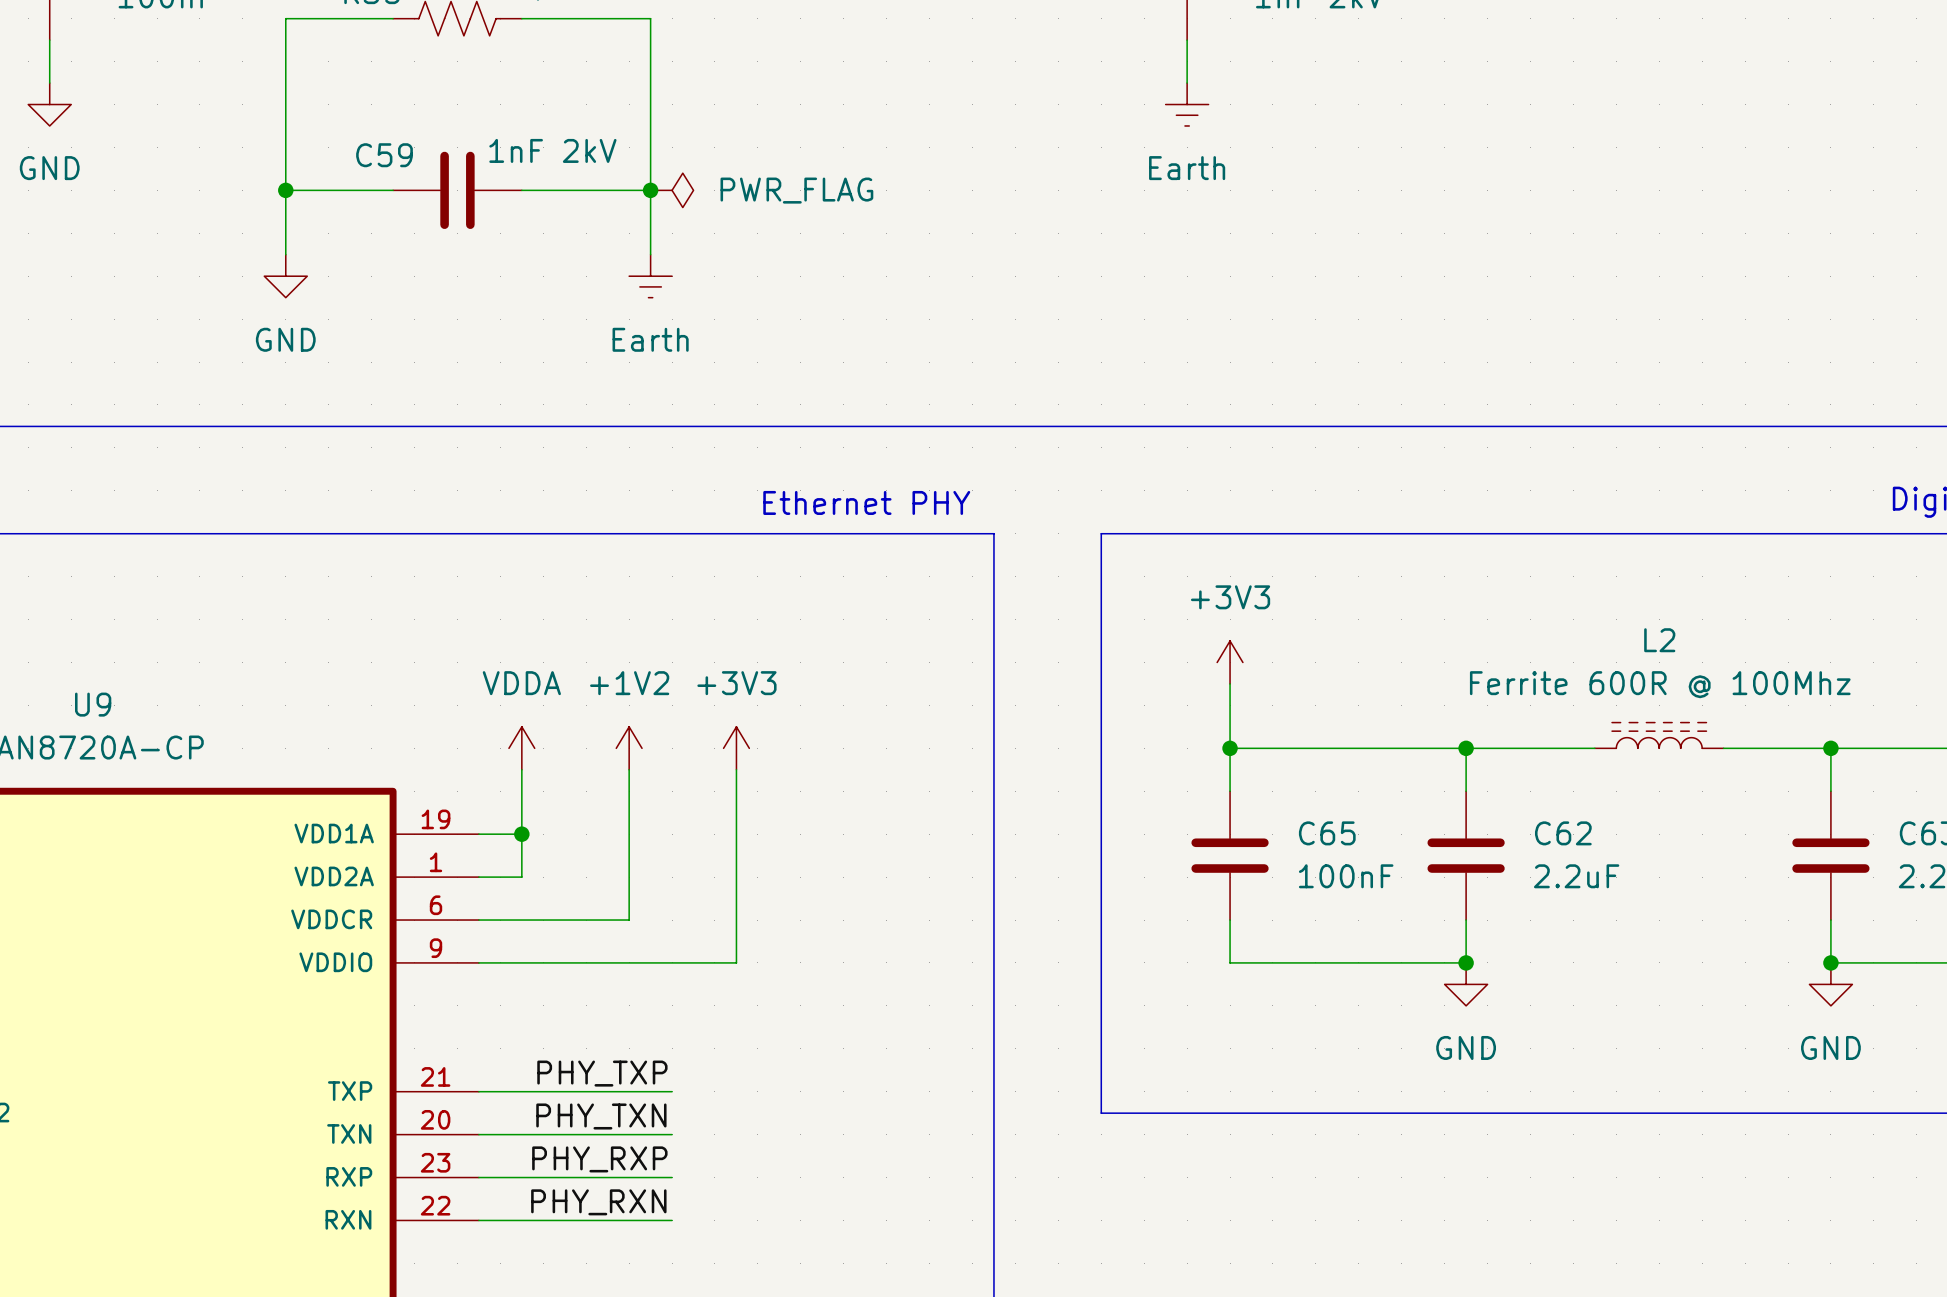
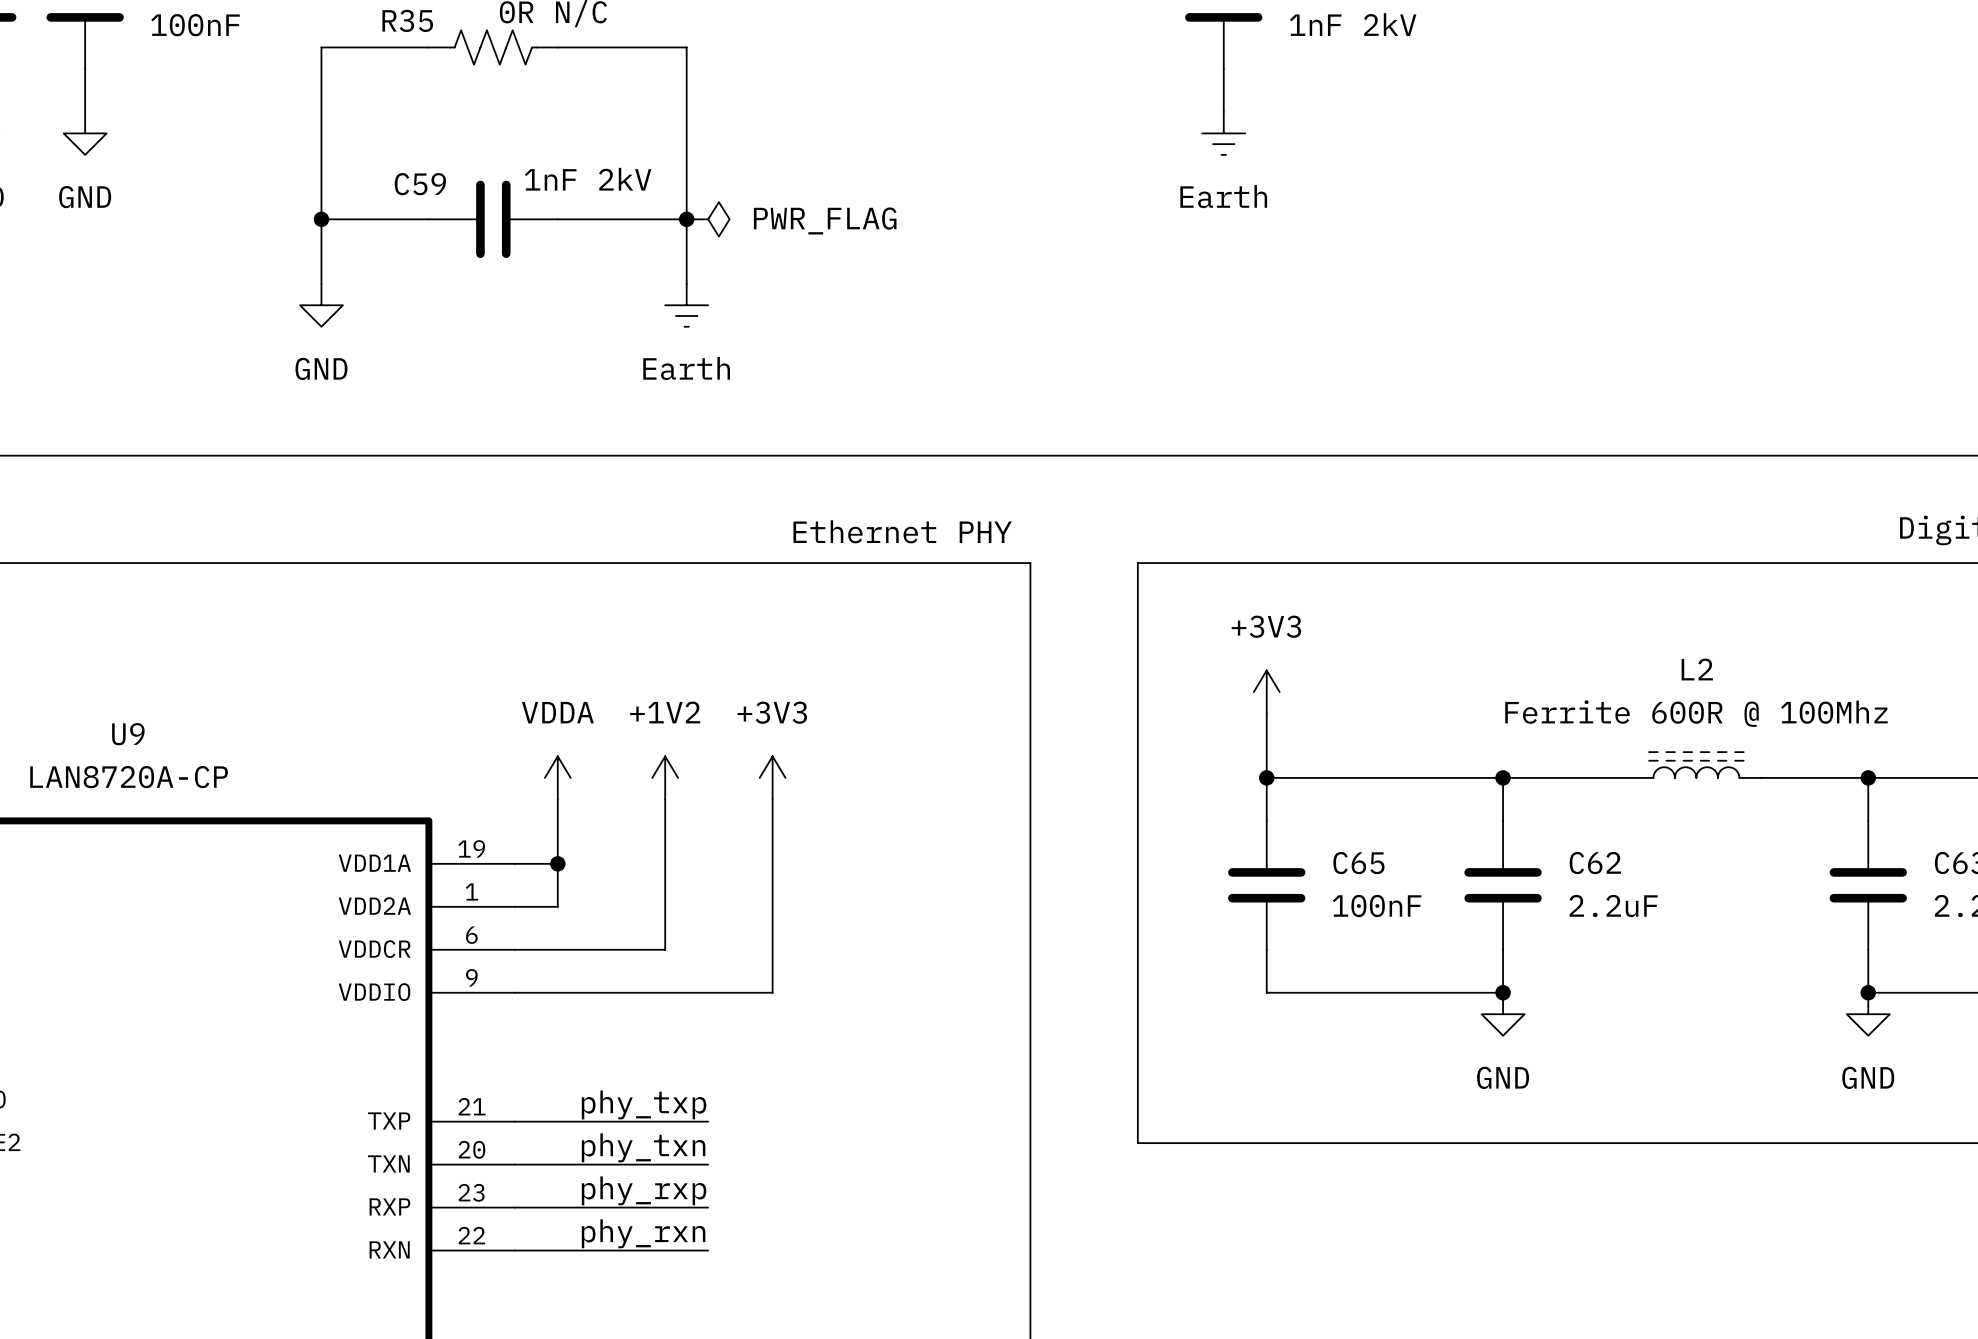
label: PHY_TXP (602, 1073) -> phy_txp (644, 1104)
label: PHY_TXN (601, 1116) -> phy_txn (643, 1147)
label: PHY_RXP (599, 1159) -> phy_rxp (644, 1190)
label: PHY_RXN (598, 1202) -> phy_rxn (643, 1233)

